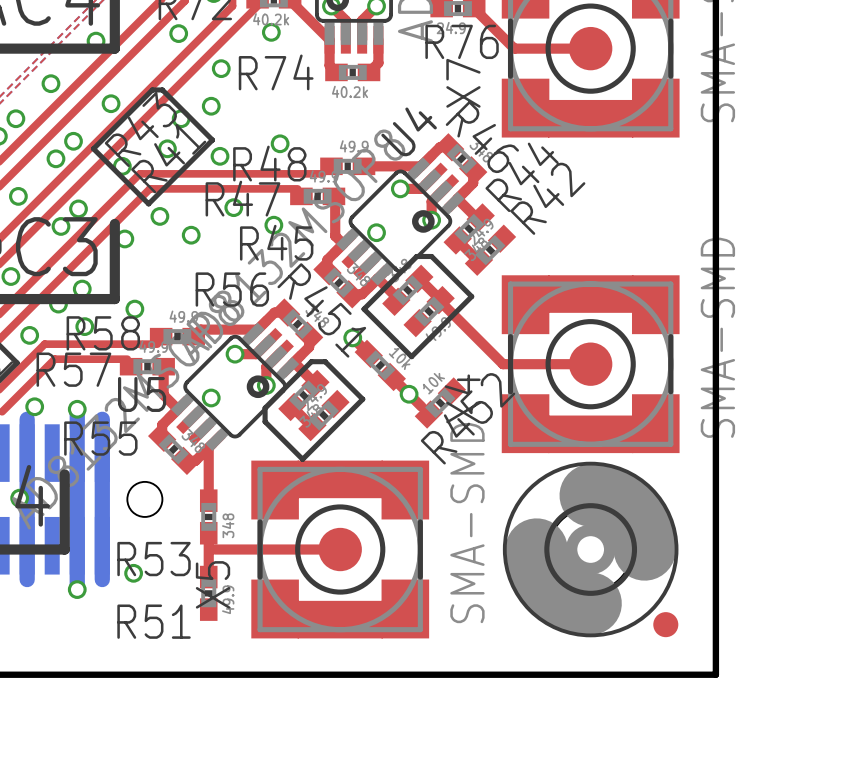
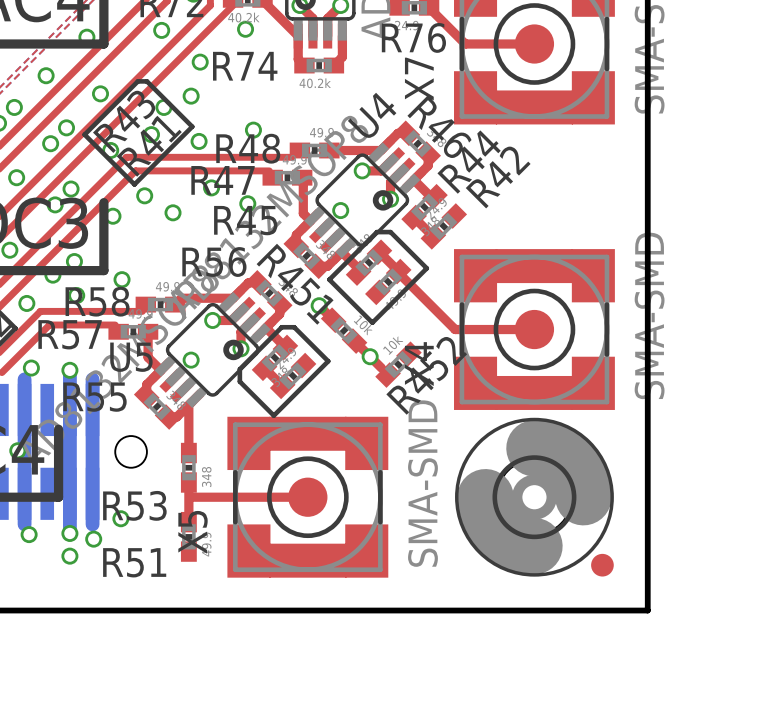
via: none -> (29, 534)
via: none -> (93, 539)
via: none -> (69, 556)

